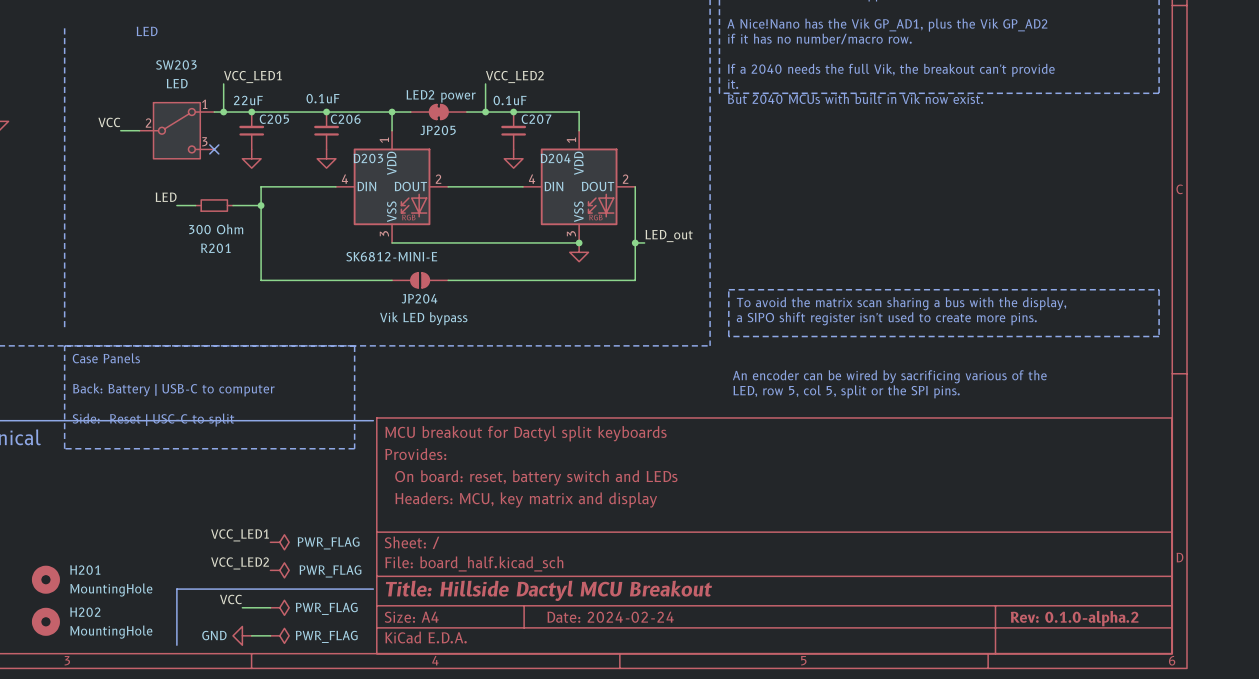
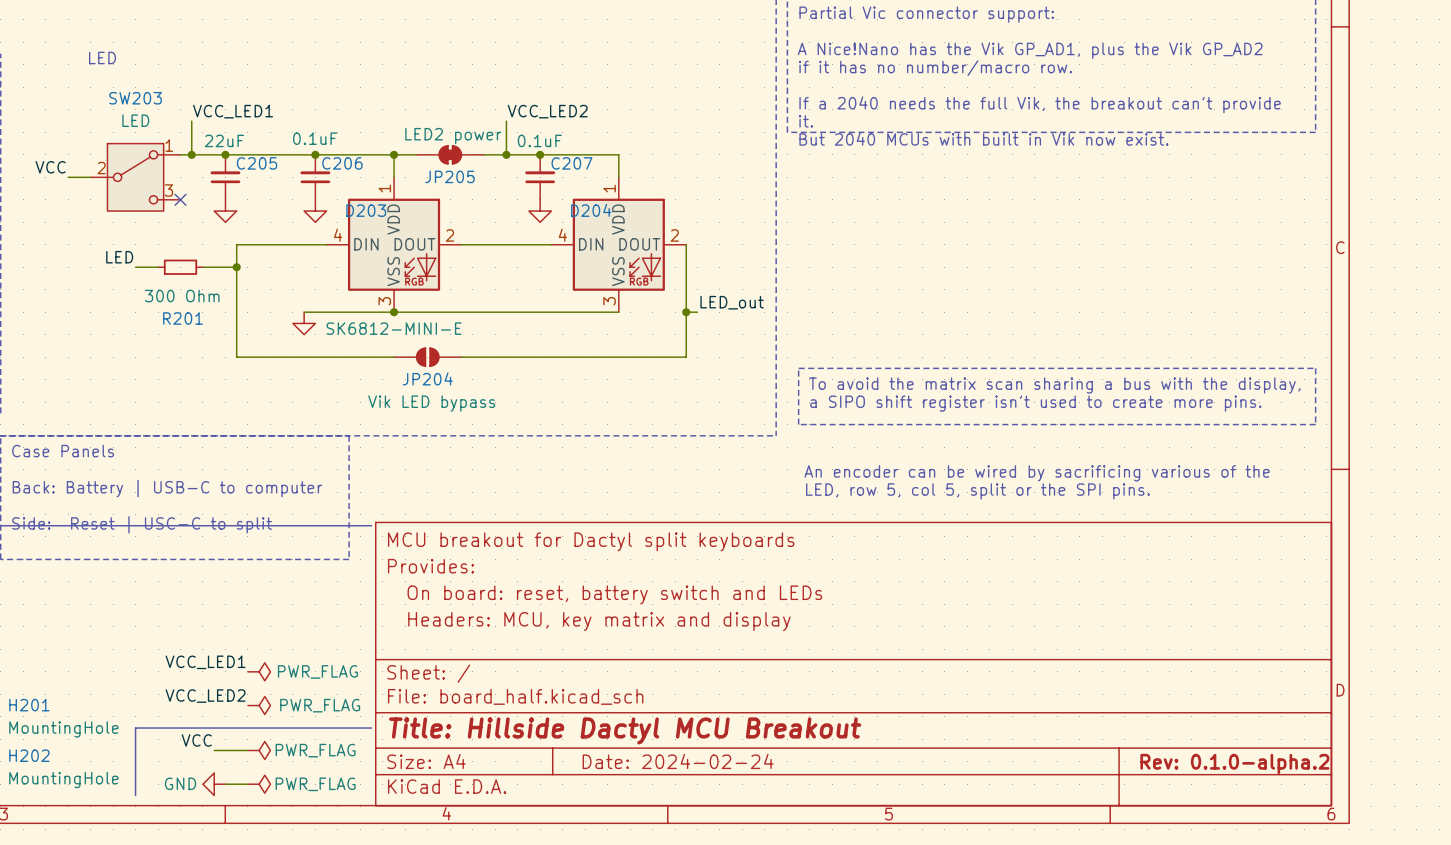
wire: none -> (304, 312) (394, 312)
junction: none -> (394, 312)
junction: (579, 242) -> none
power symbol: none -> (304, 323)
power symbol: (579, 252) -> none

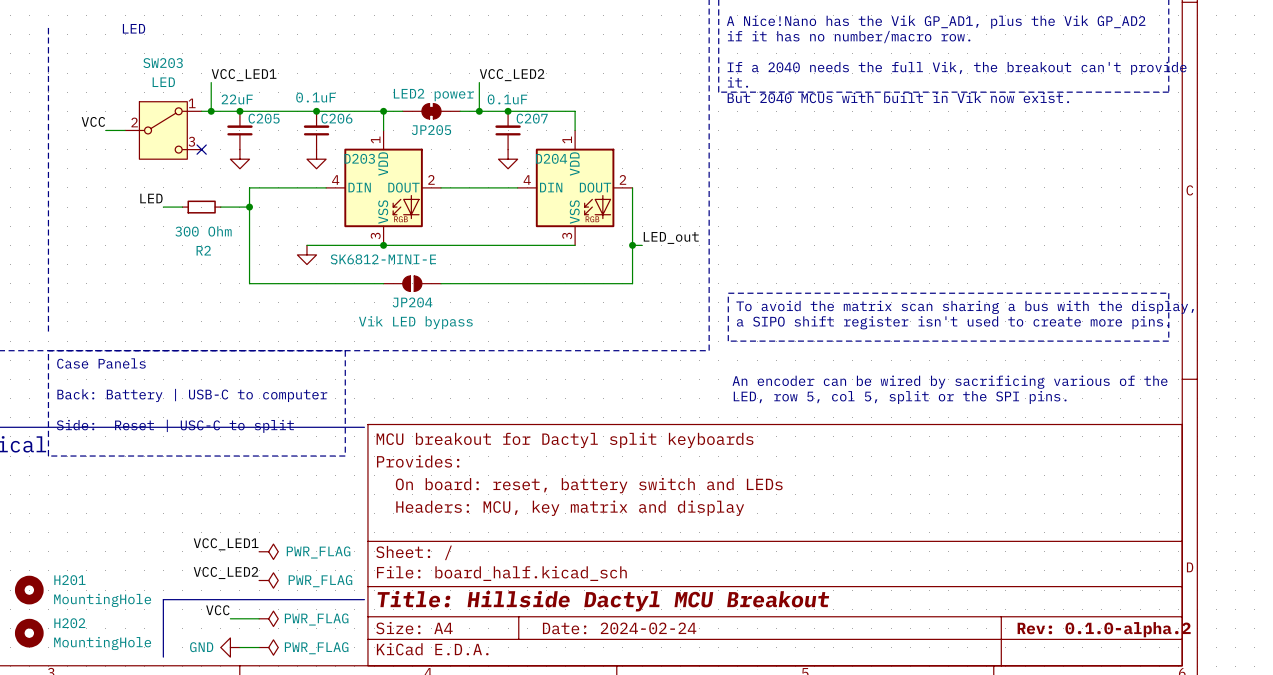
R201 name: R201 (183, 318) -> R2 (203, 250)

